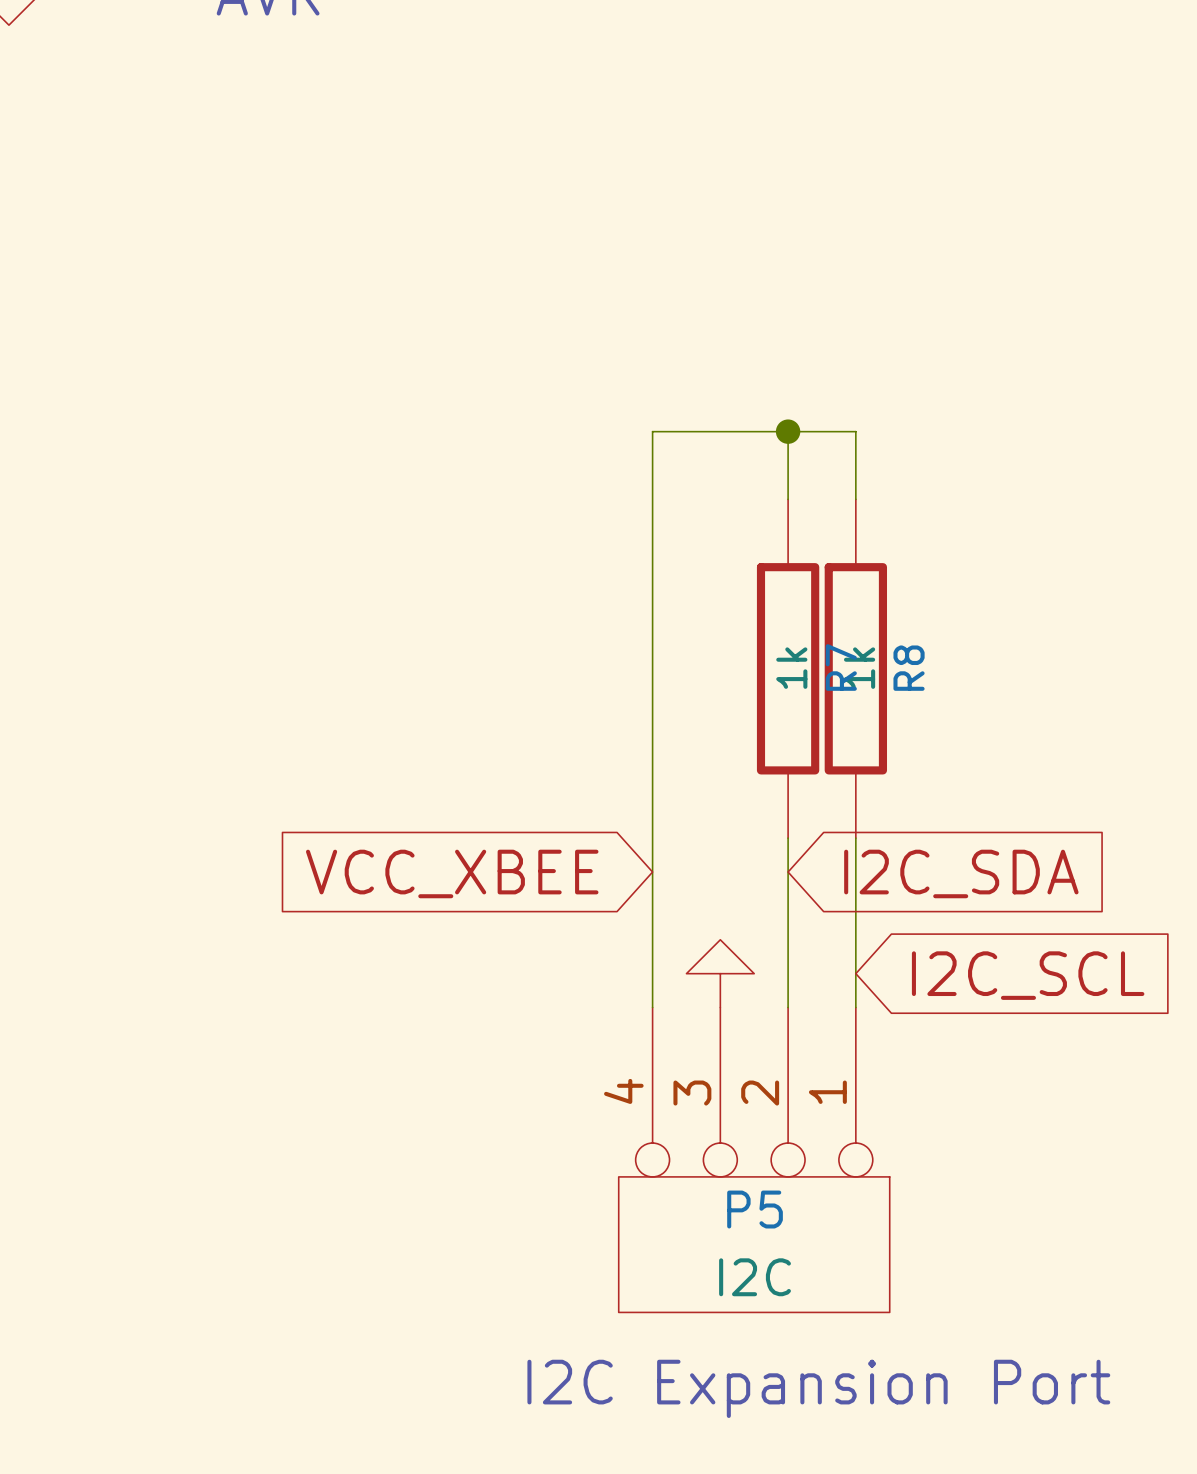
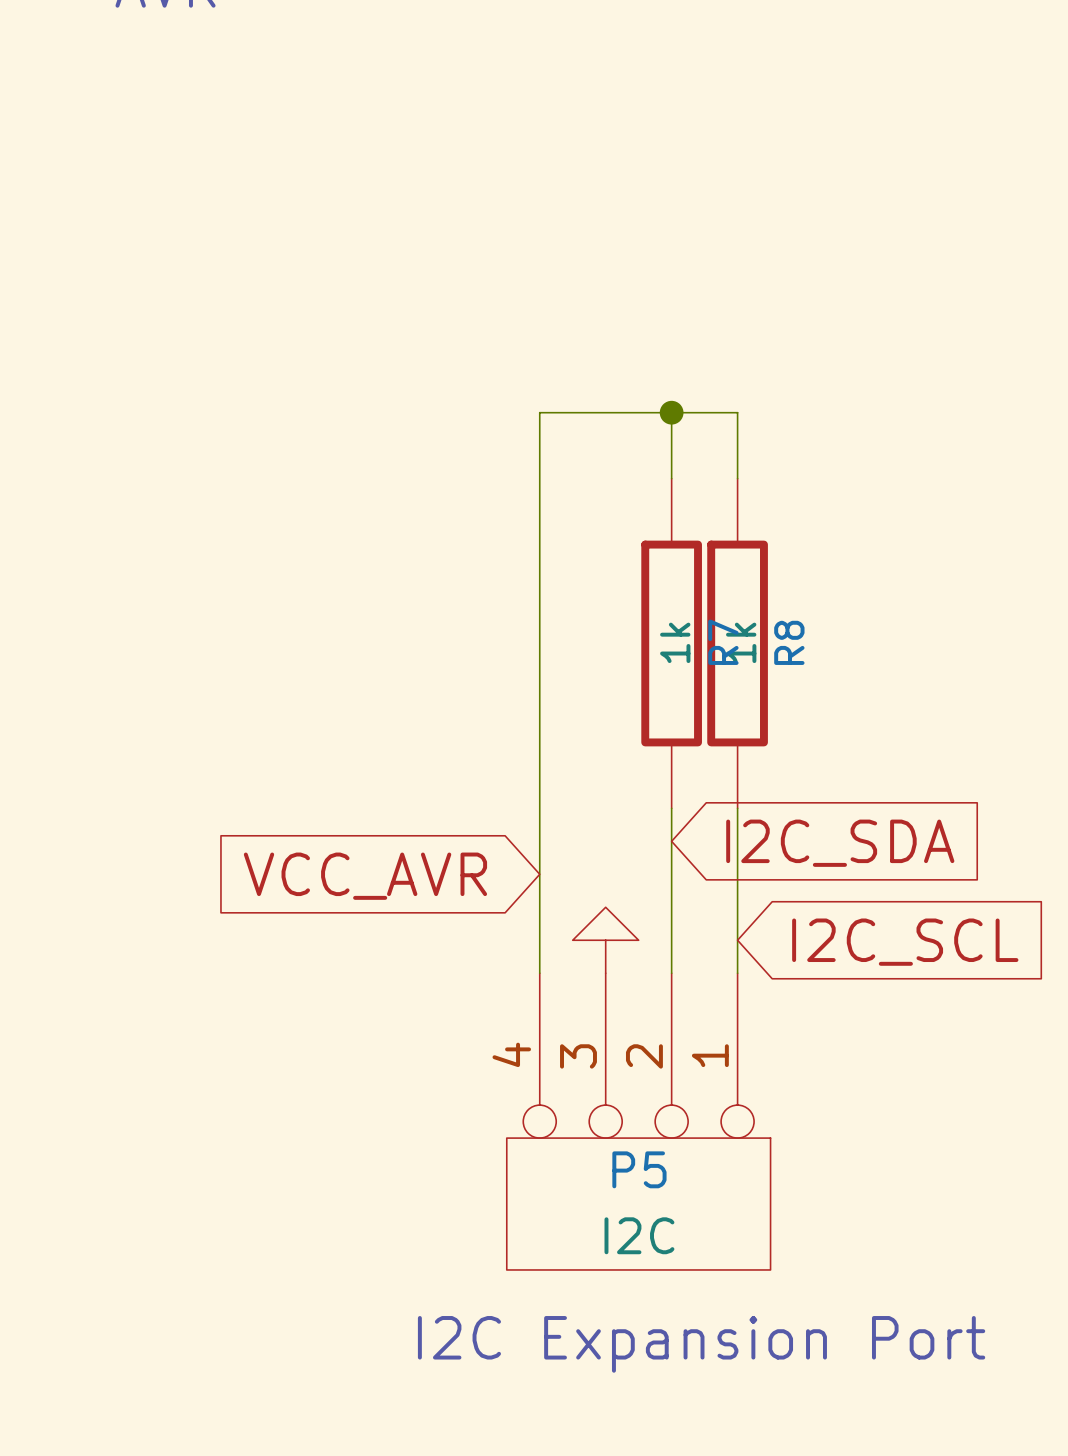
global label: VCC_XBEE (452, 873) -> none
global label: none -> VCC_AVR (365, 876)

